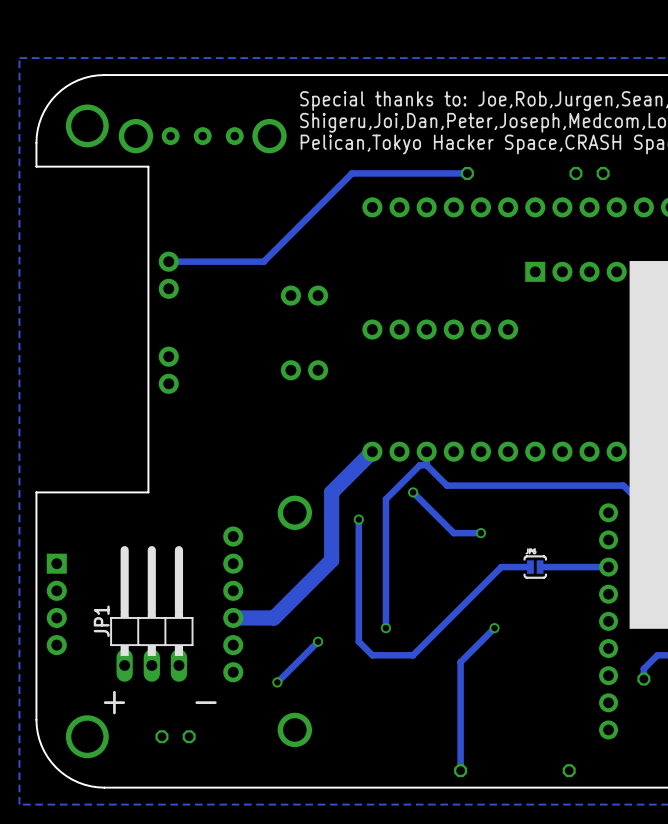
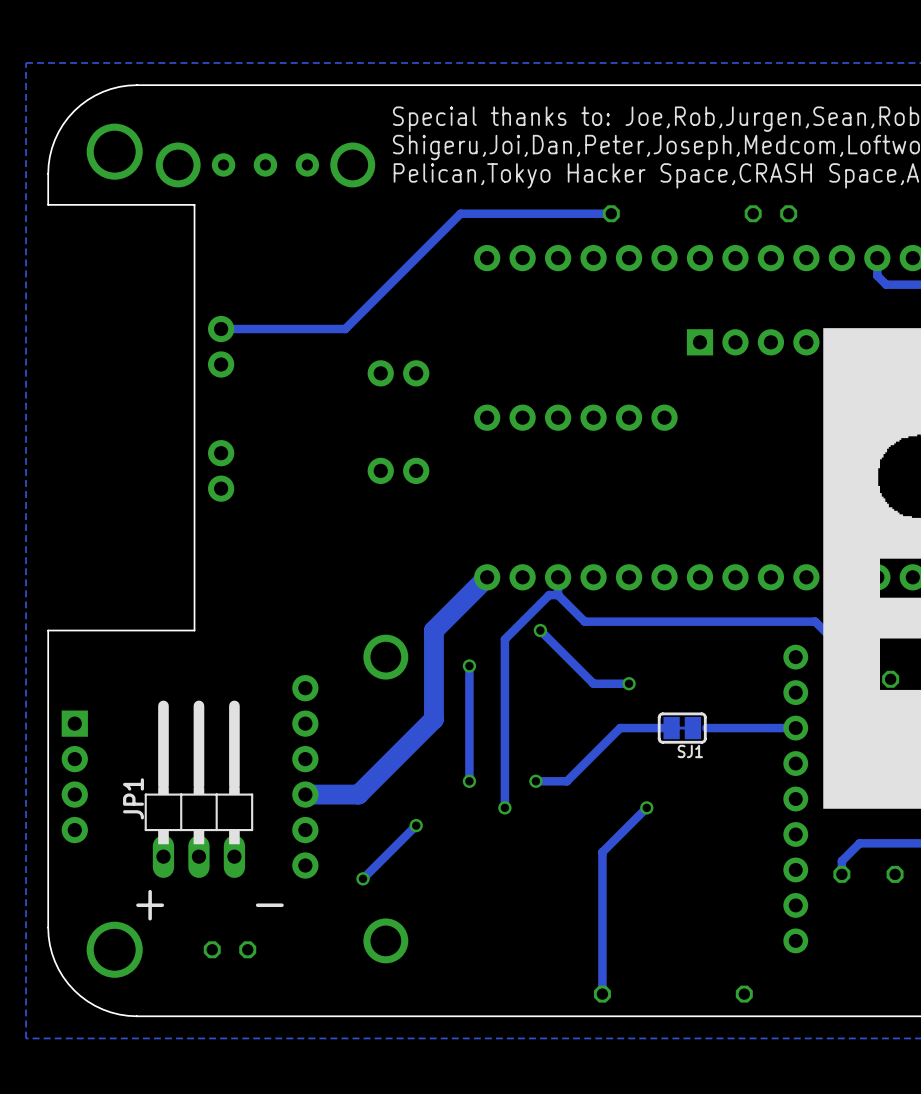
track: (501, 567) (413, 655) (372, 655) (358, 641) (358, 607) -> (655, 728) (620, 728) (566, 781) (535, 781)
SJ1: none -> (682, 728)
track: (529, 567) (513, 567) -> none
part: (535, 567) -> none
via: none -> (469, 781)
via: none -> (535, 781)

